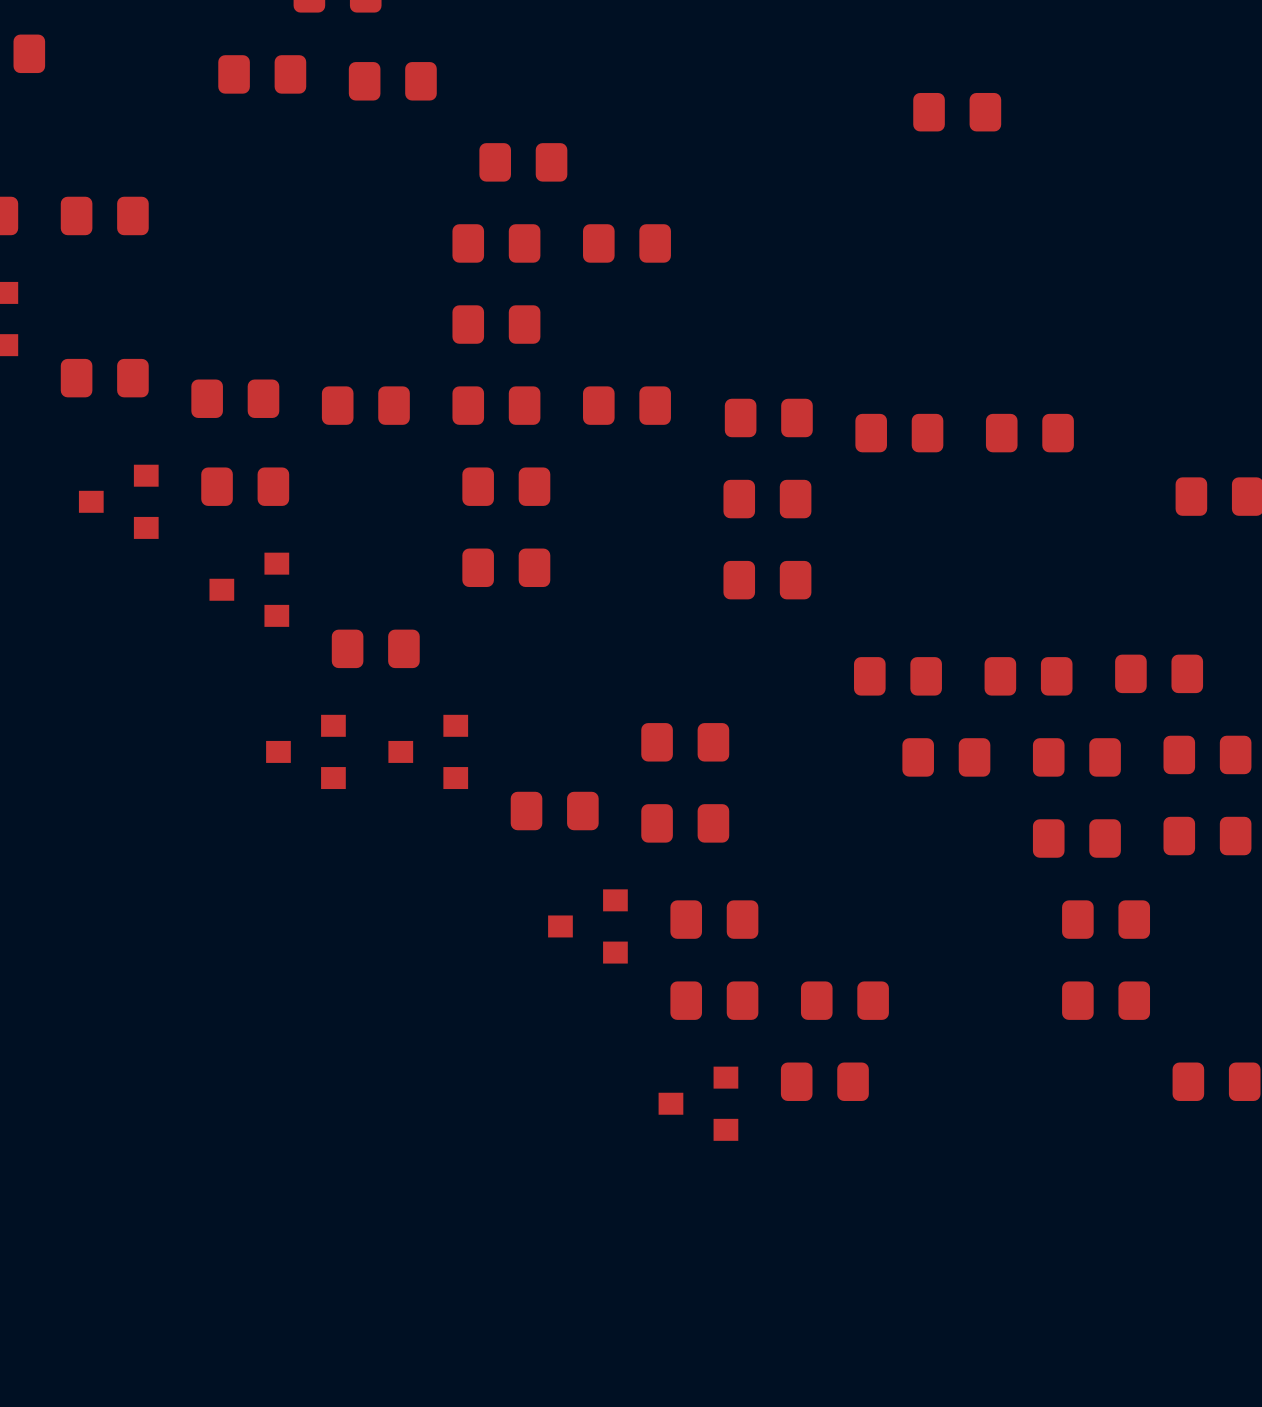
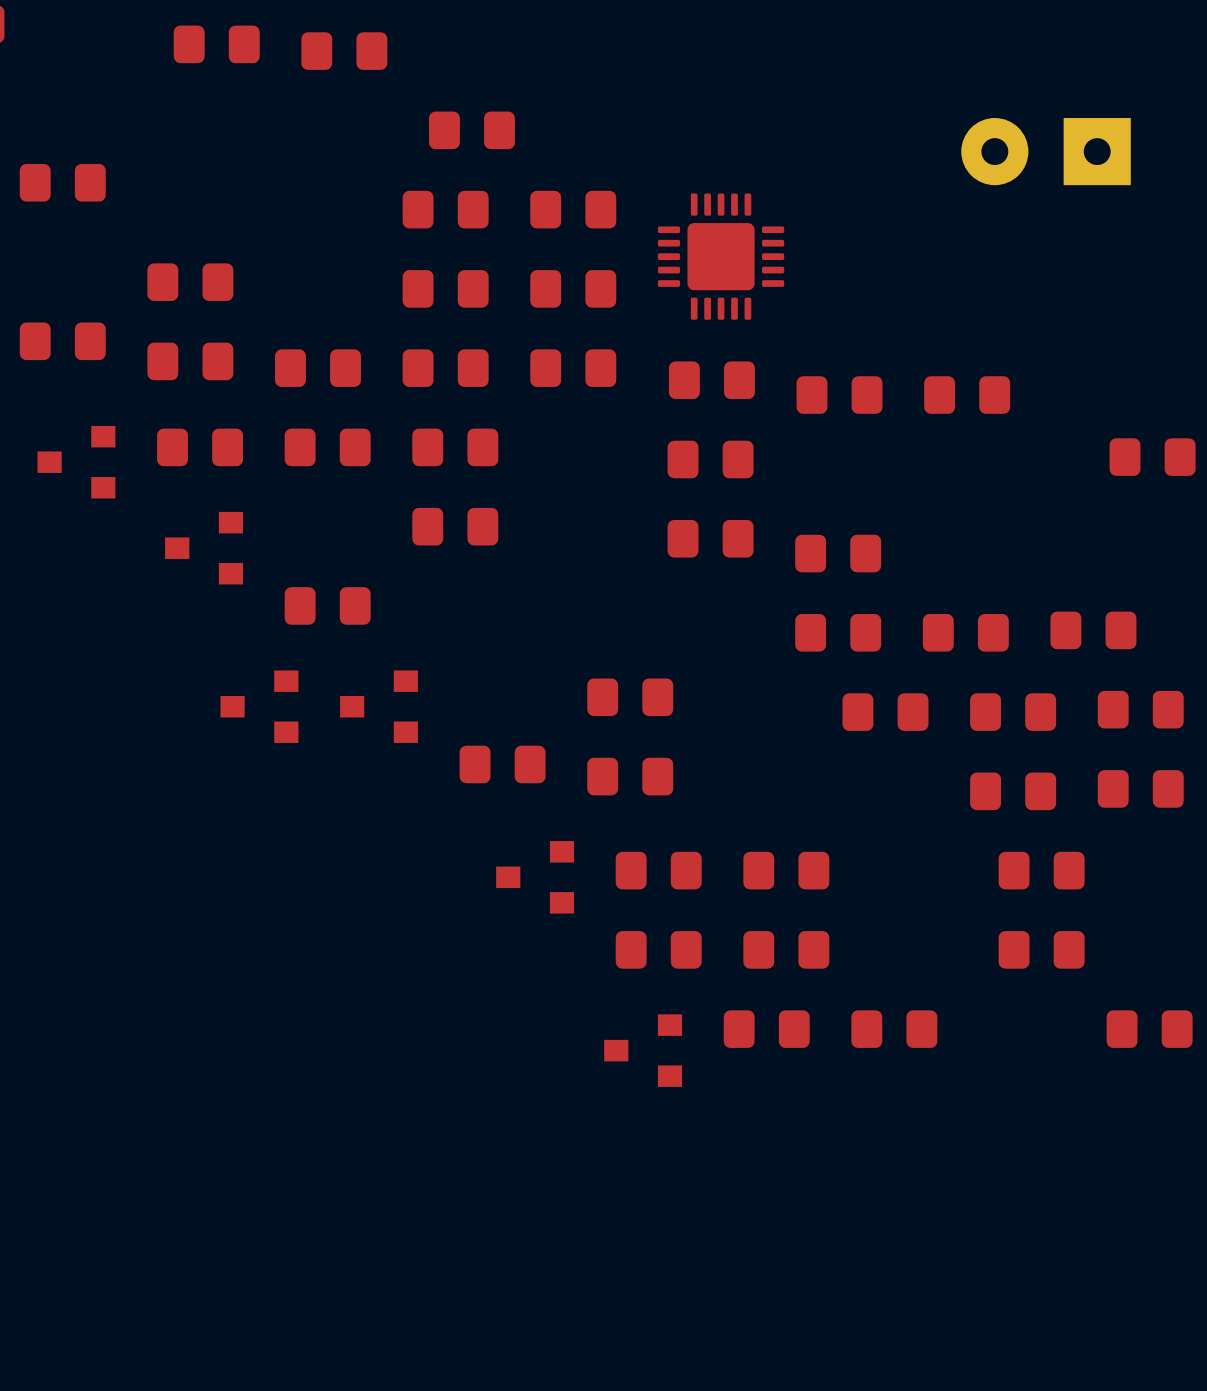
part: (957, 112) -> none
part: none -> (1046, 151)
part: none -> (721, 256)
part: none -> (190, 282)
part: none -> (573, 288)
part: none -> (327, 447)
part: none -> (838, 553)
part: none -> (786, 870)
part: none -> (894, 1029)

